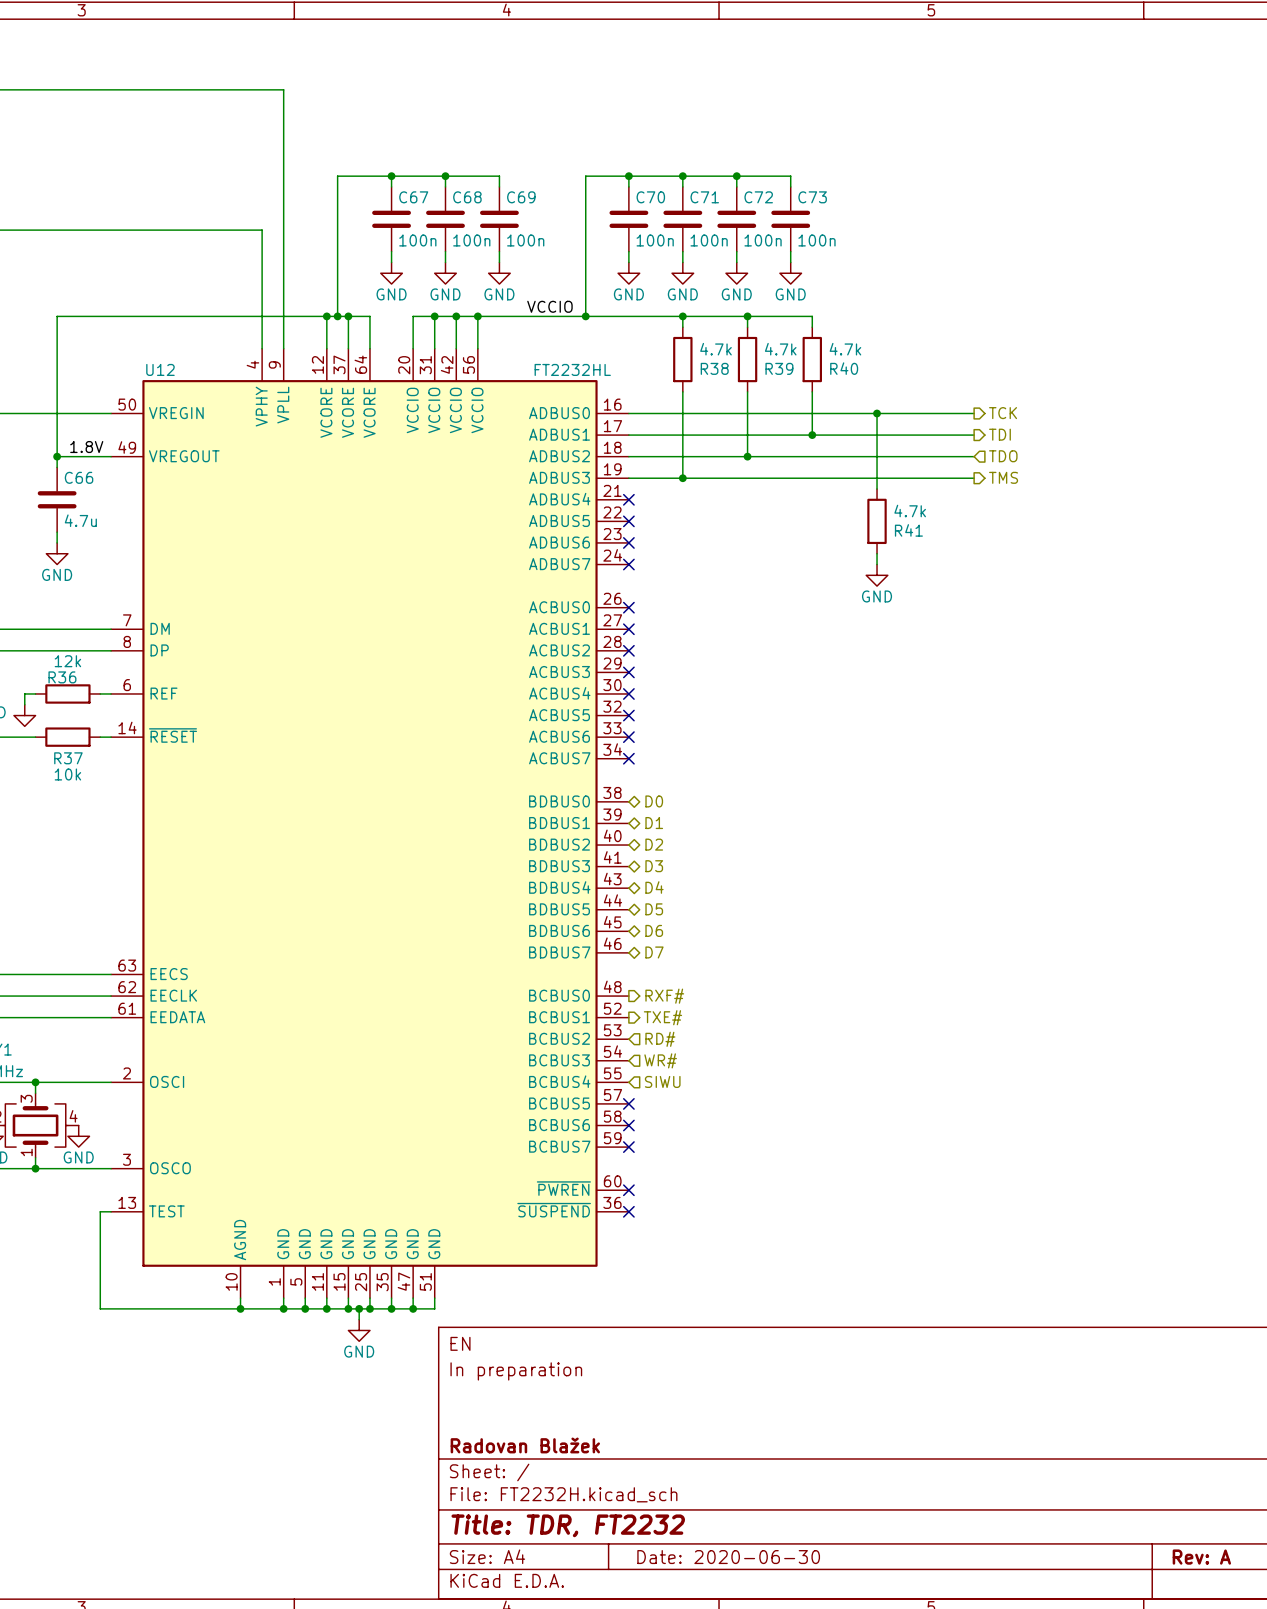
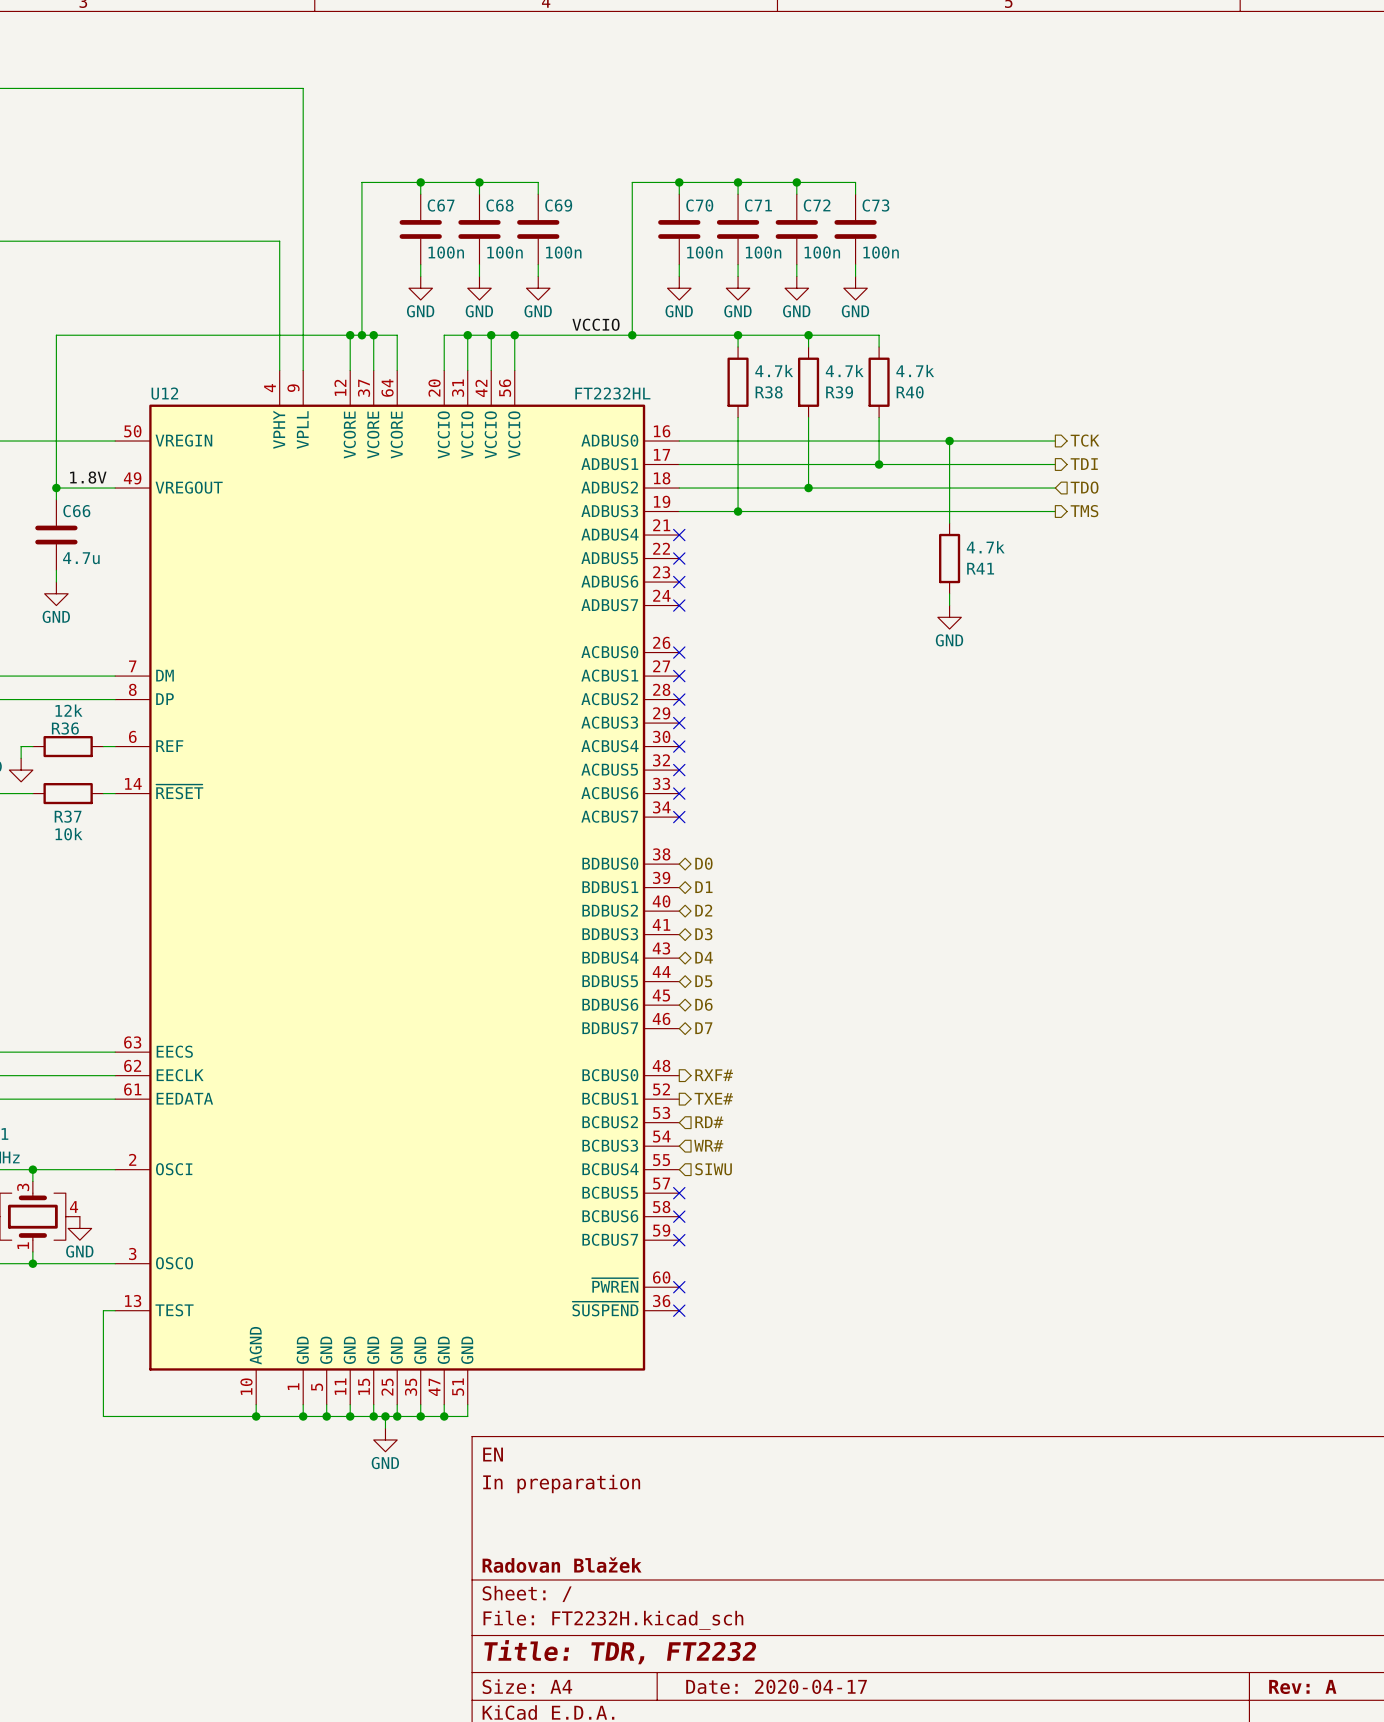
title block: Date: 2020-06-30 (728, 1557) -> Date: 2020-04-17 (776, 1686)

